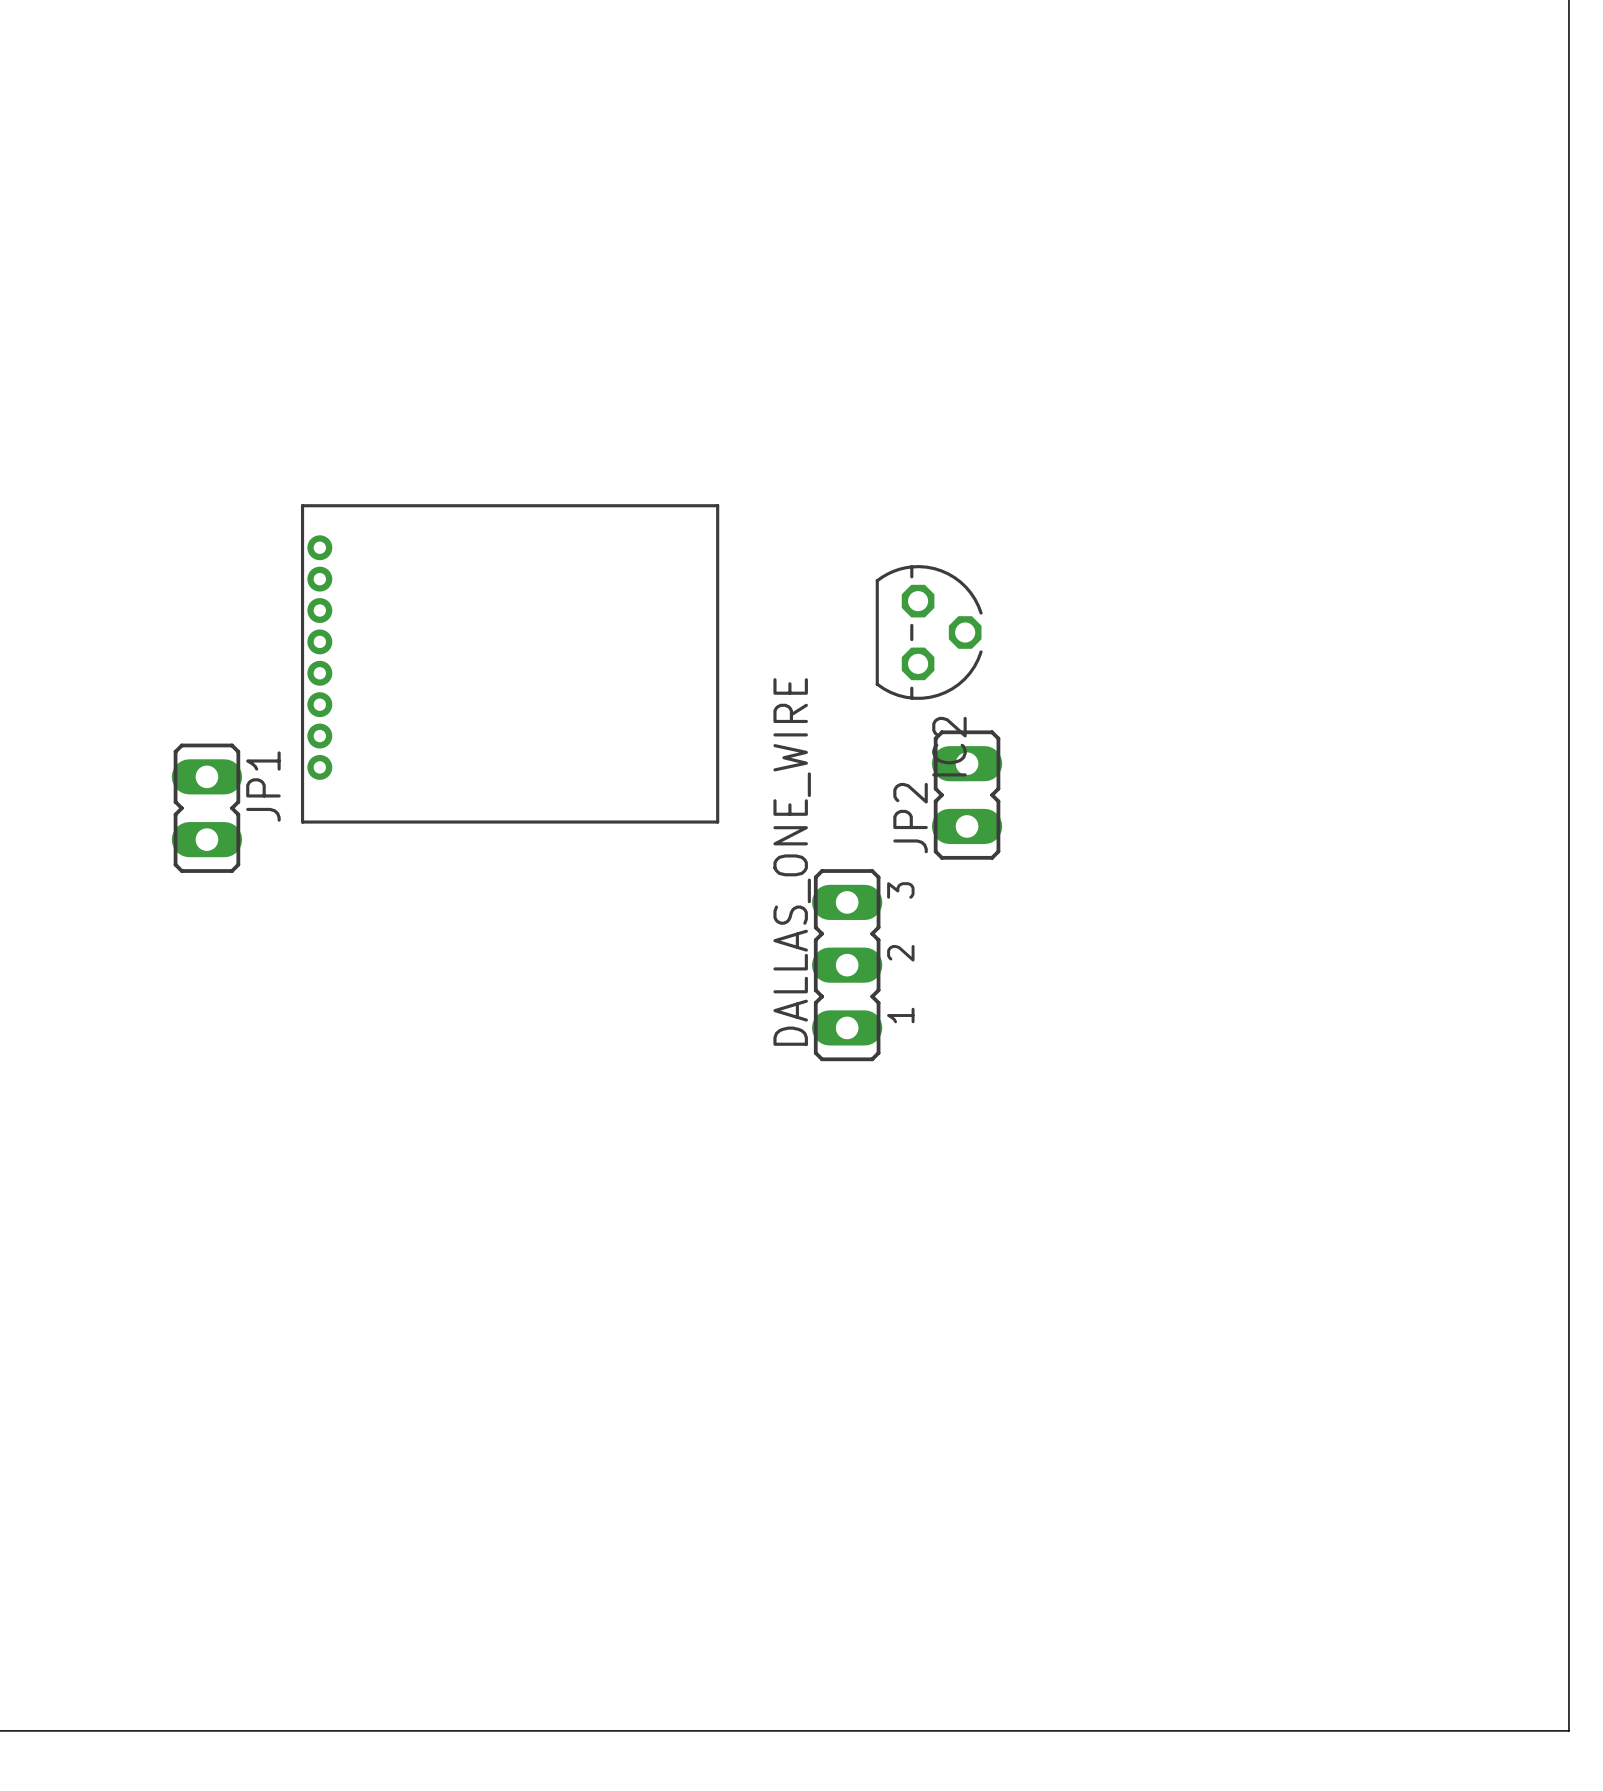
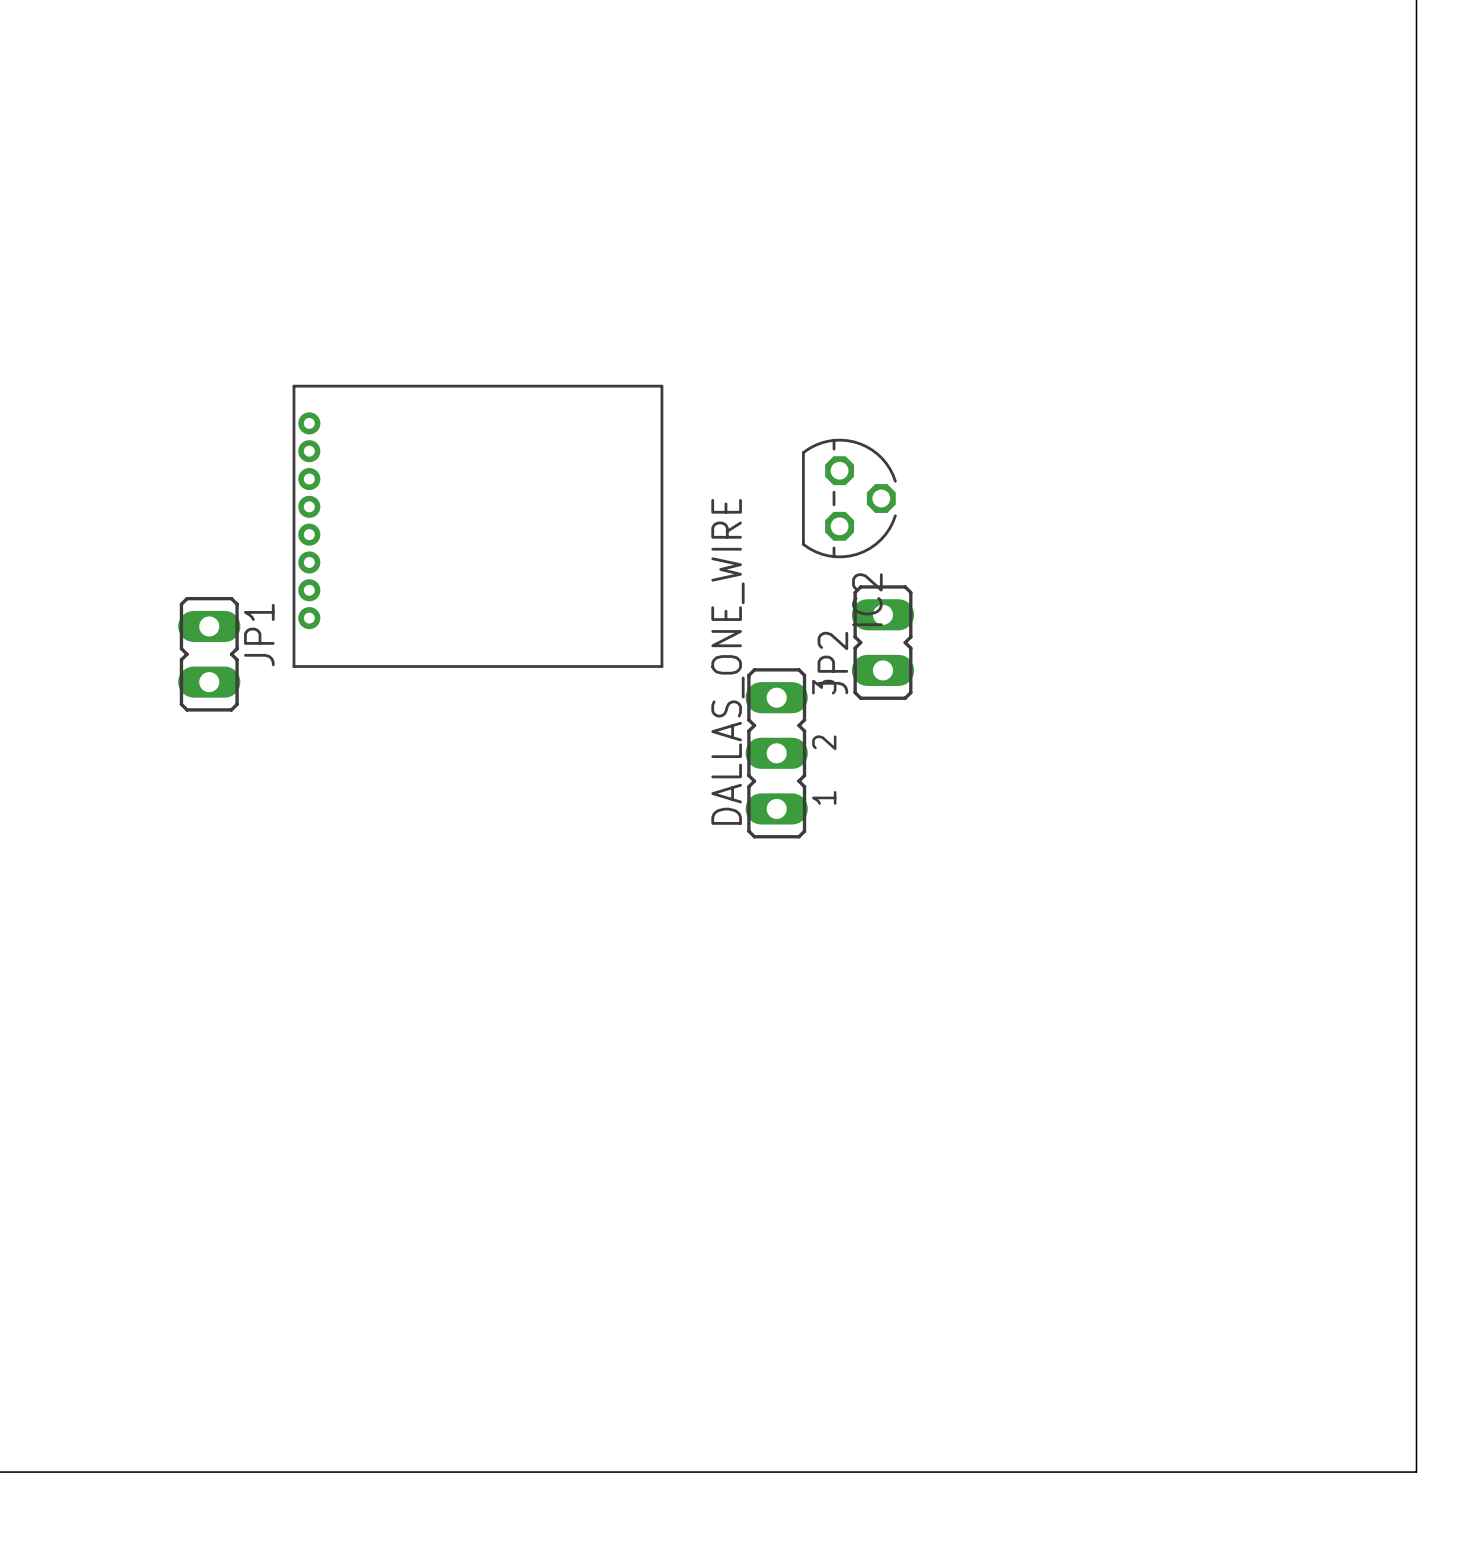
DALLAS_ONE_WIRE position: (847, 965) -> (776, 753)

